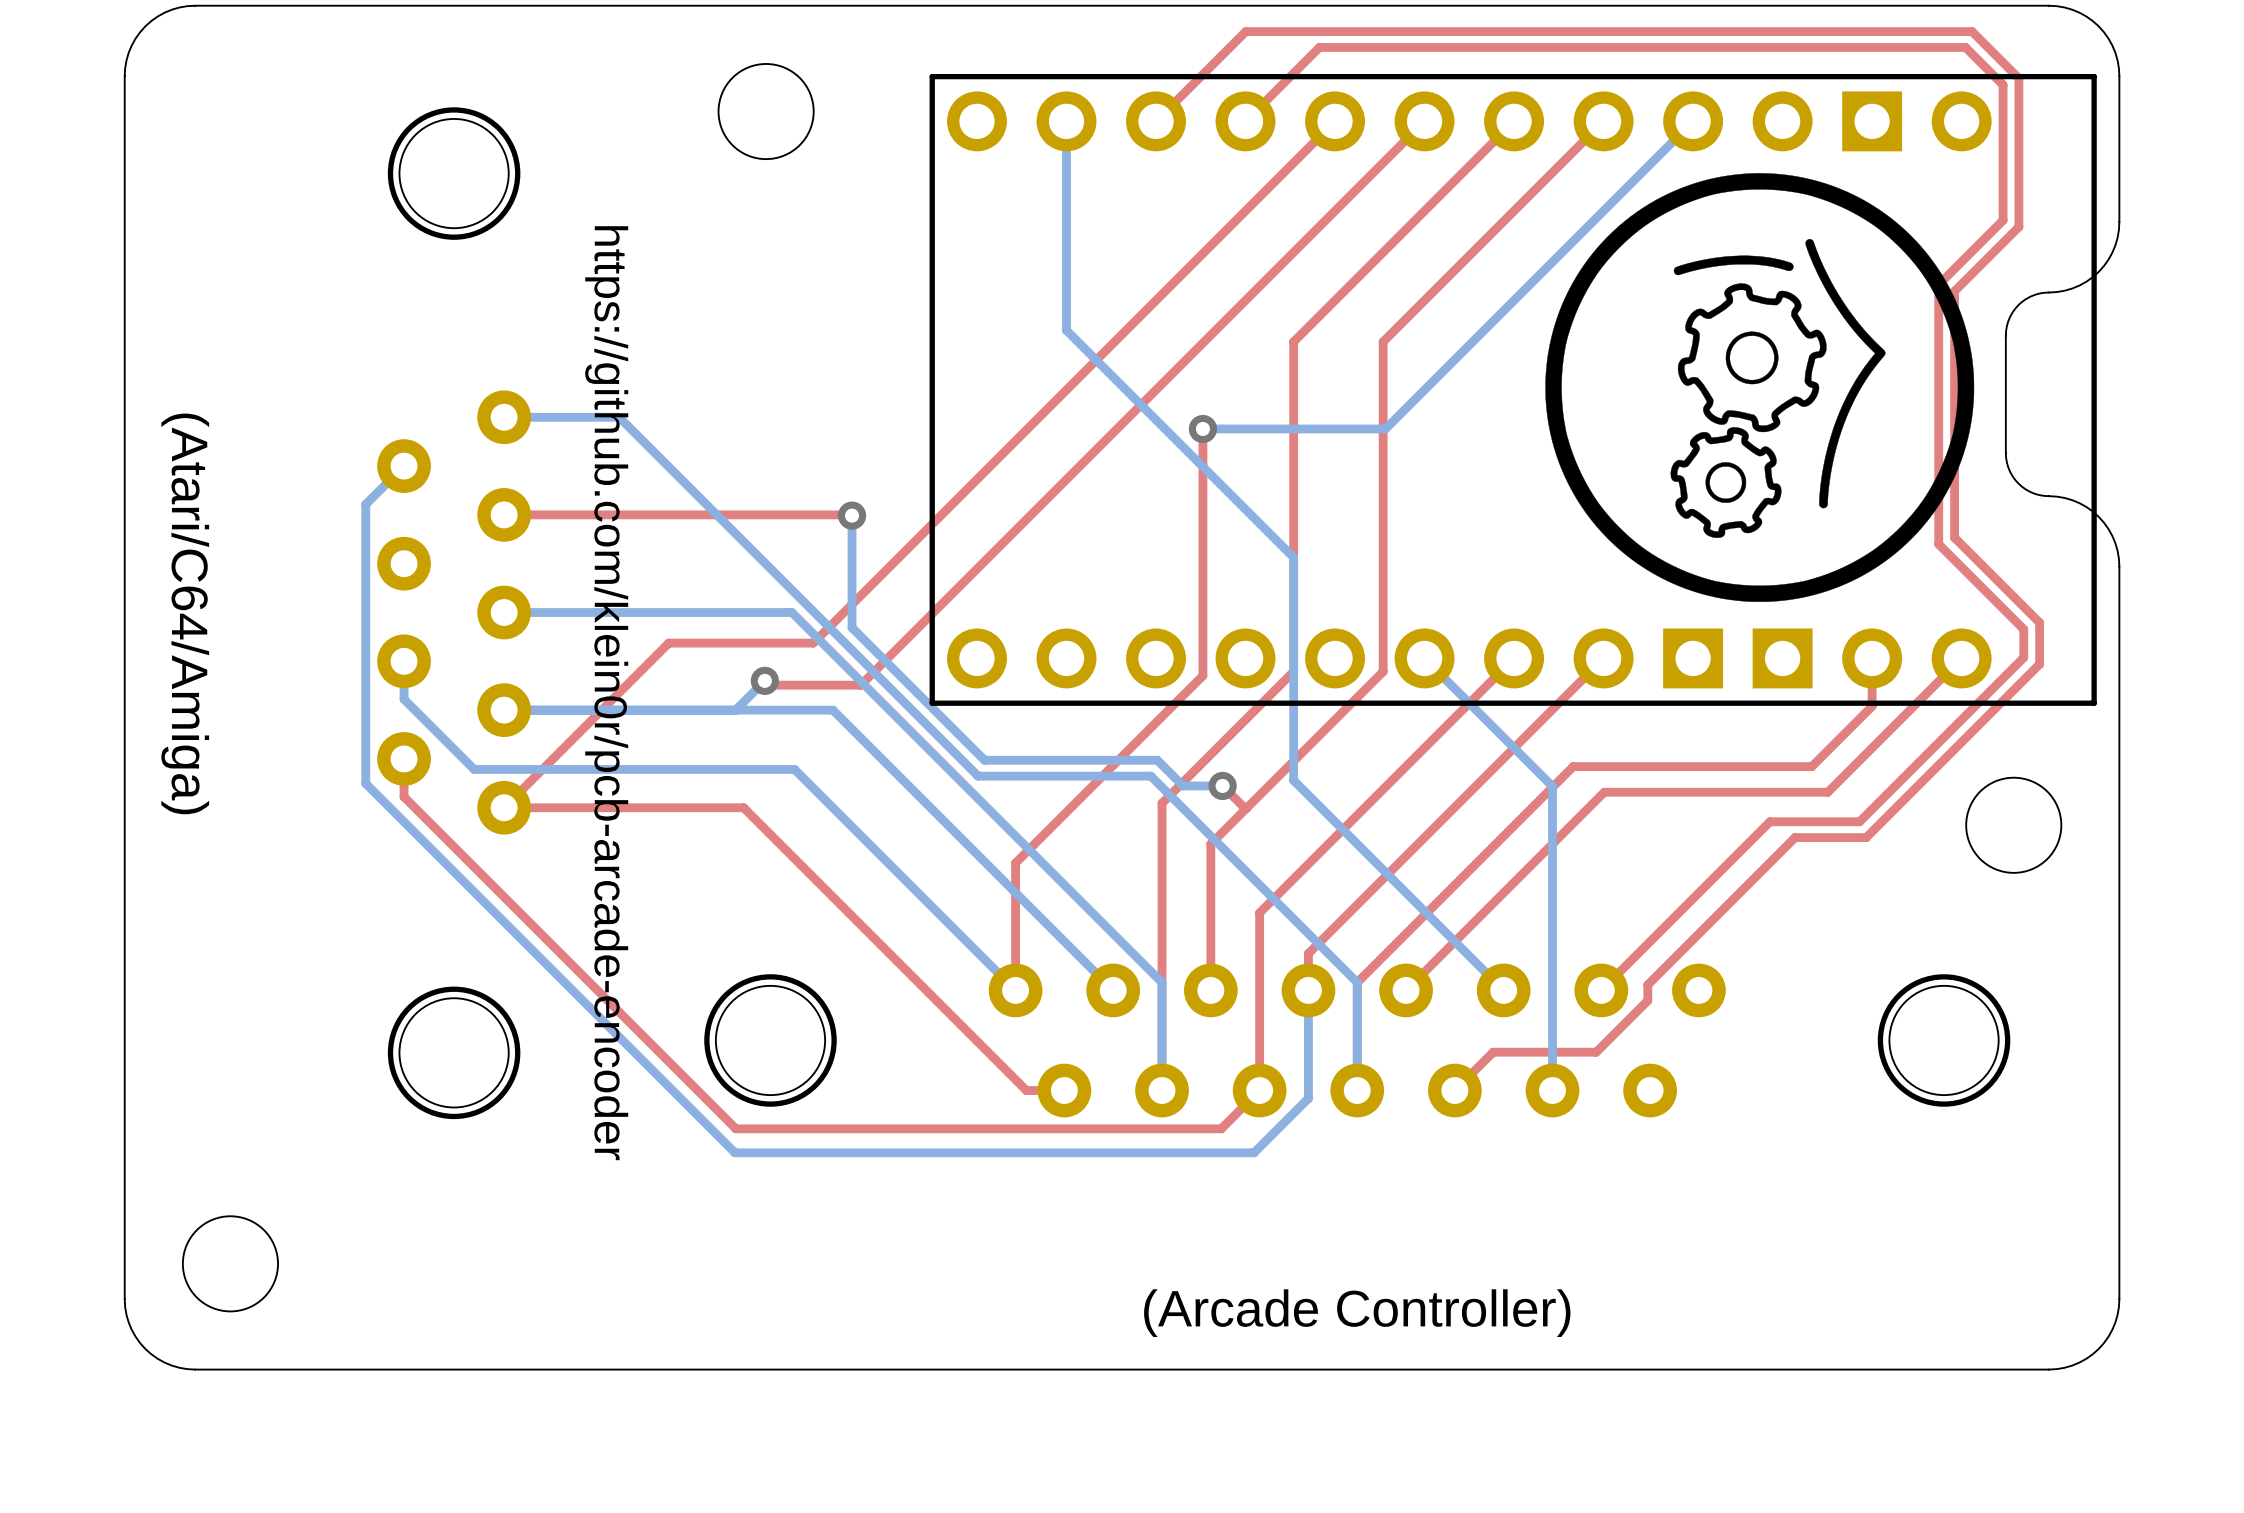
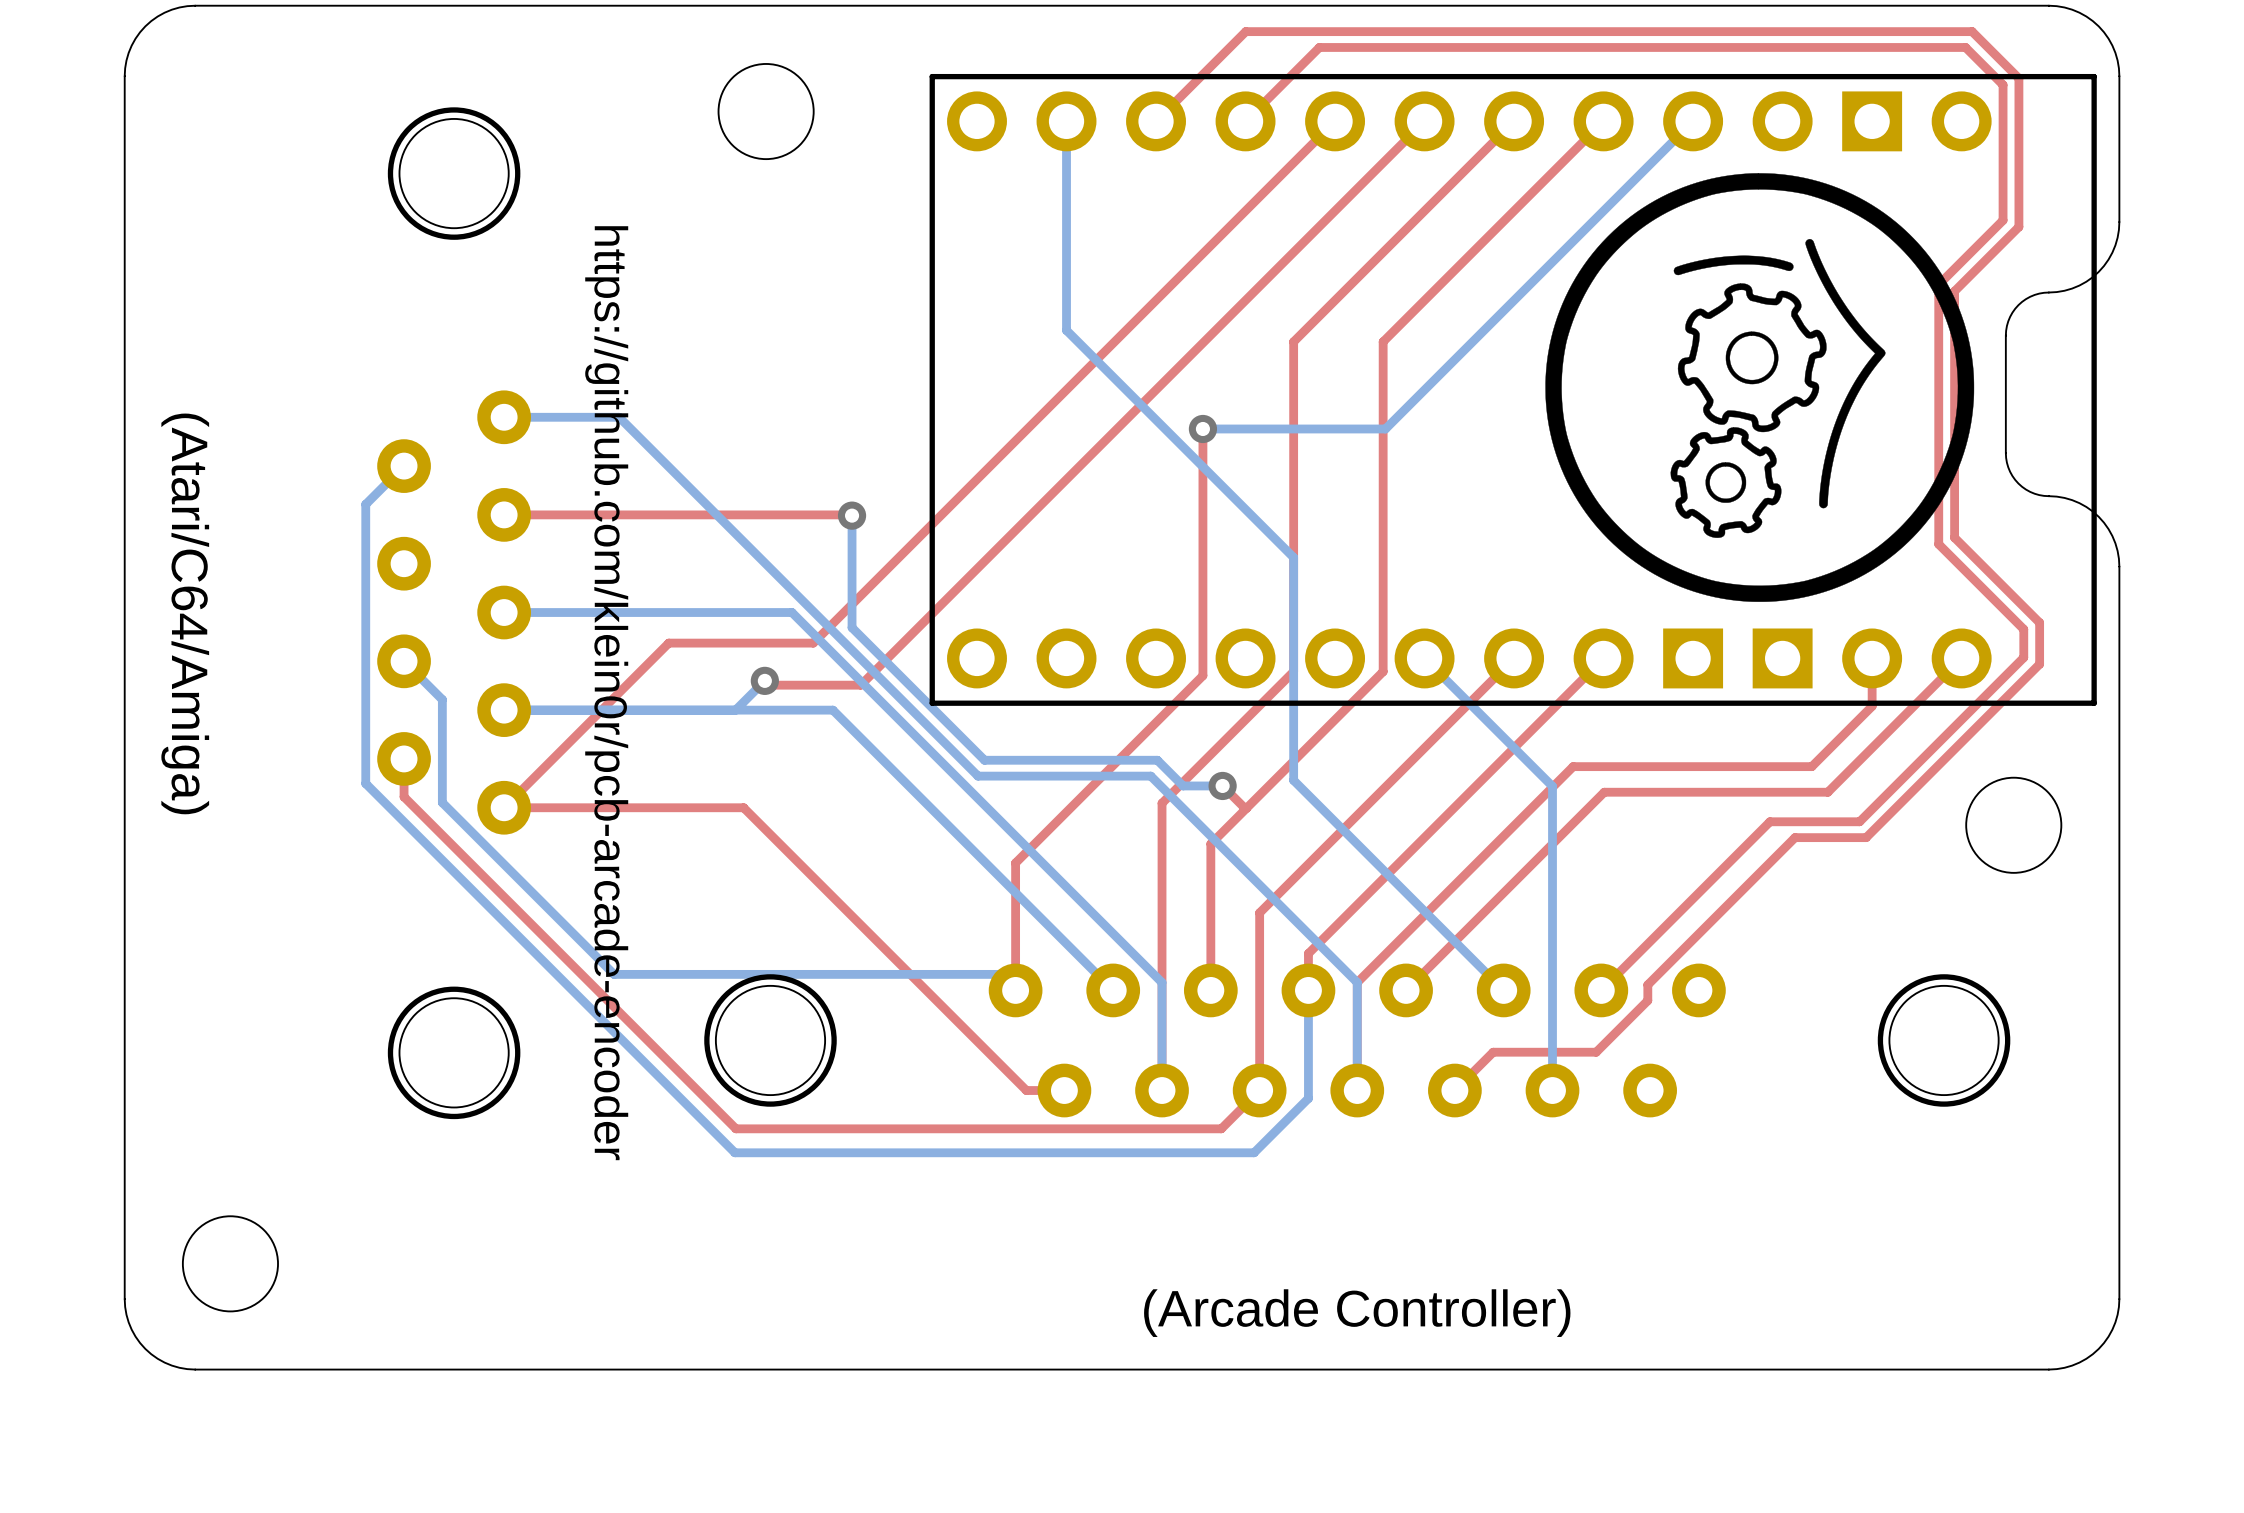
bottom track: (404, 661) (404, 699) (474, 769) (794, 769) (999, 974) -> (404, 661) (442, 699) (442, 802) (614, 974) (999, 974)

